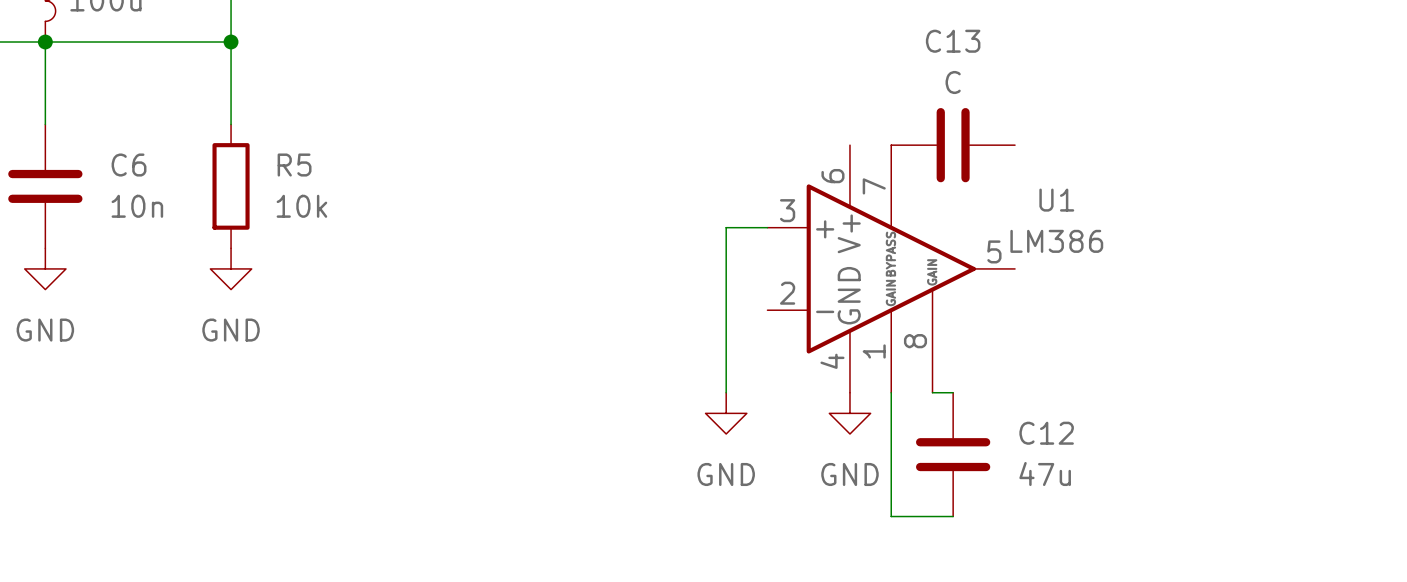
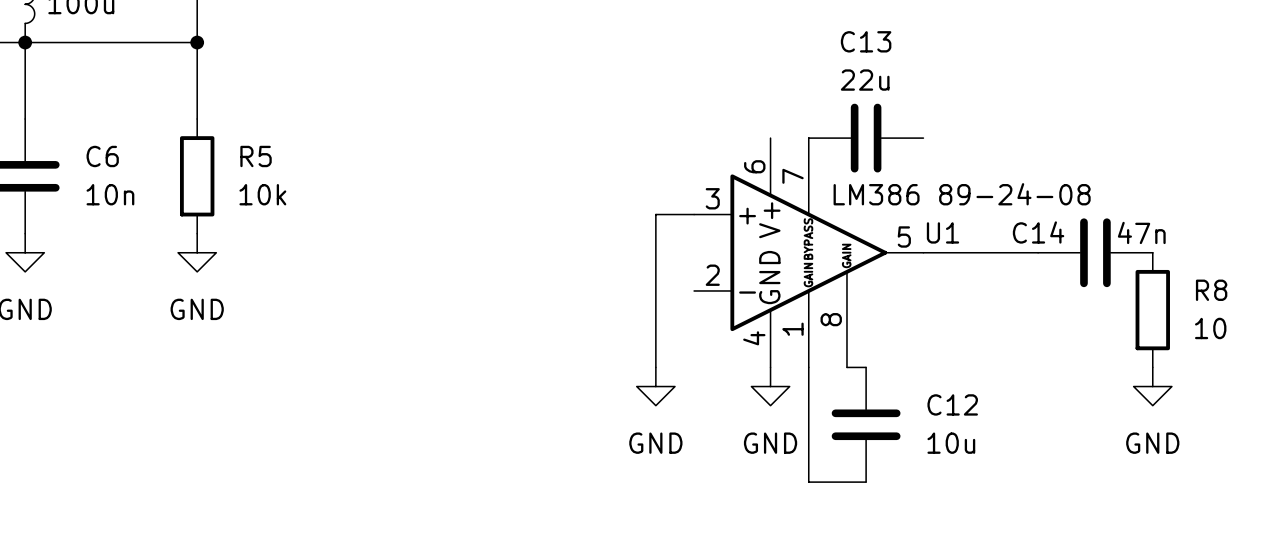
C13 value: C (953, 82) -> 22u (865, 80)
U1 name position: U1 (1056, 200) -> U1 (943, 232)
U1 value: LM386 (1056, 241) -> LM386 89-24-08 (962, 194)
wire: none -> (923, 252) (1038, 252)
C14: none -> 47n (1095, 252)
R8: none -> 10 (1152, 310)
power symbol: none -> GND (1152, 386)
C12 value: 47u (1045, 474) -> 10u (951, 443)

